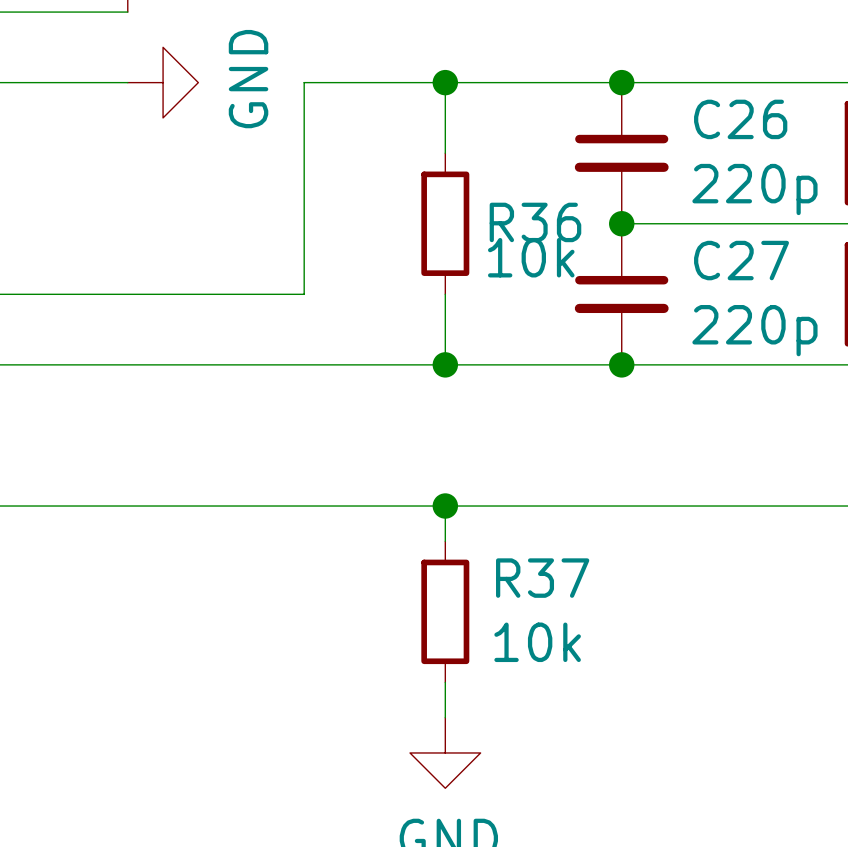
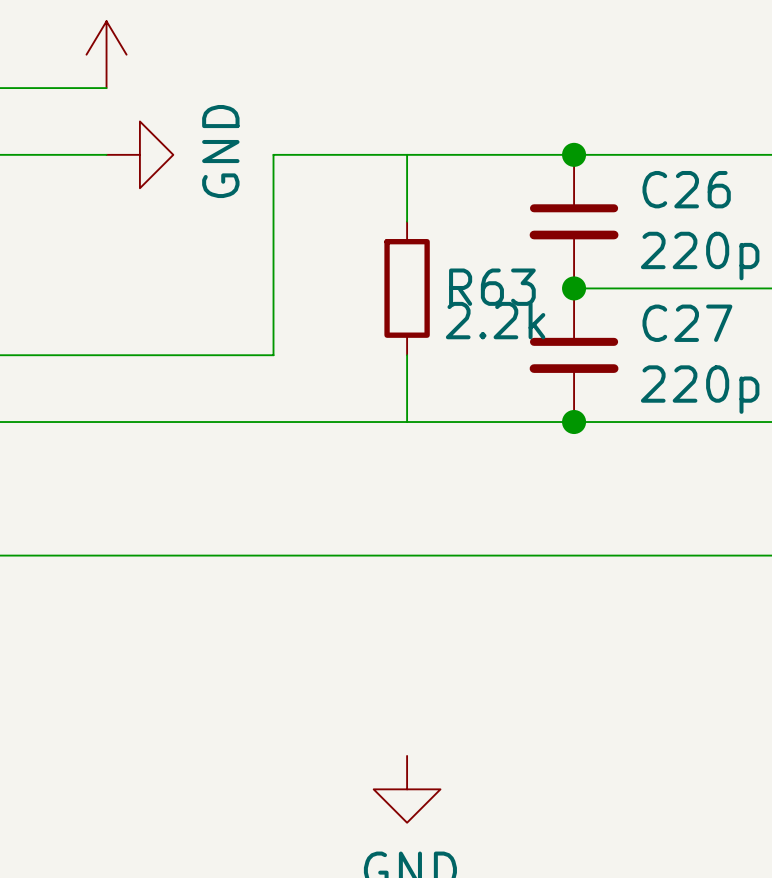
junction: (445, 82) -> none
R36 name: R36 (535, 222) -> R63 (492, 287)
R36 value: 10k (531, 257) -> 2.2k (495, 320)
junction: (445, 364) -> none
wire: (445, 506) (445, 541) -> none
junction: (445, 506) -> none
R37: 10k (445, 611) -> none
wire: (445, 682) (445, 717) -> none

